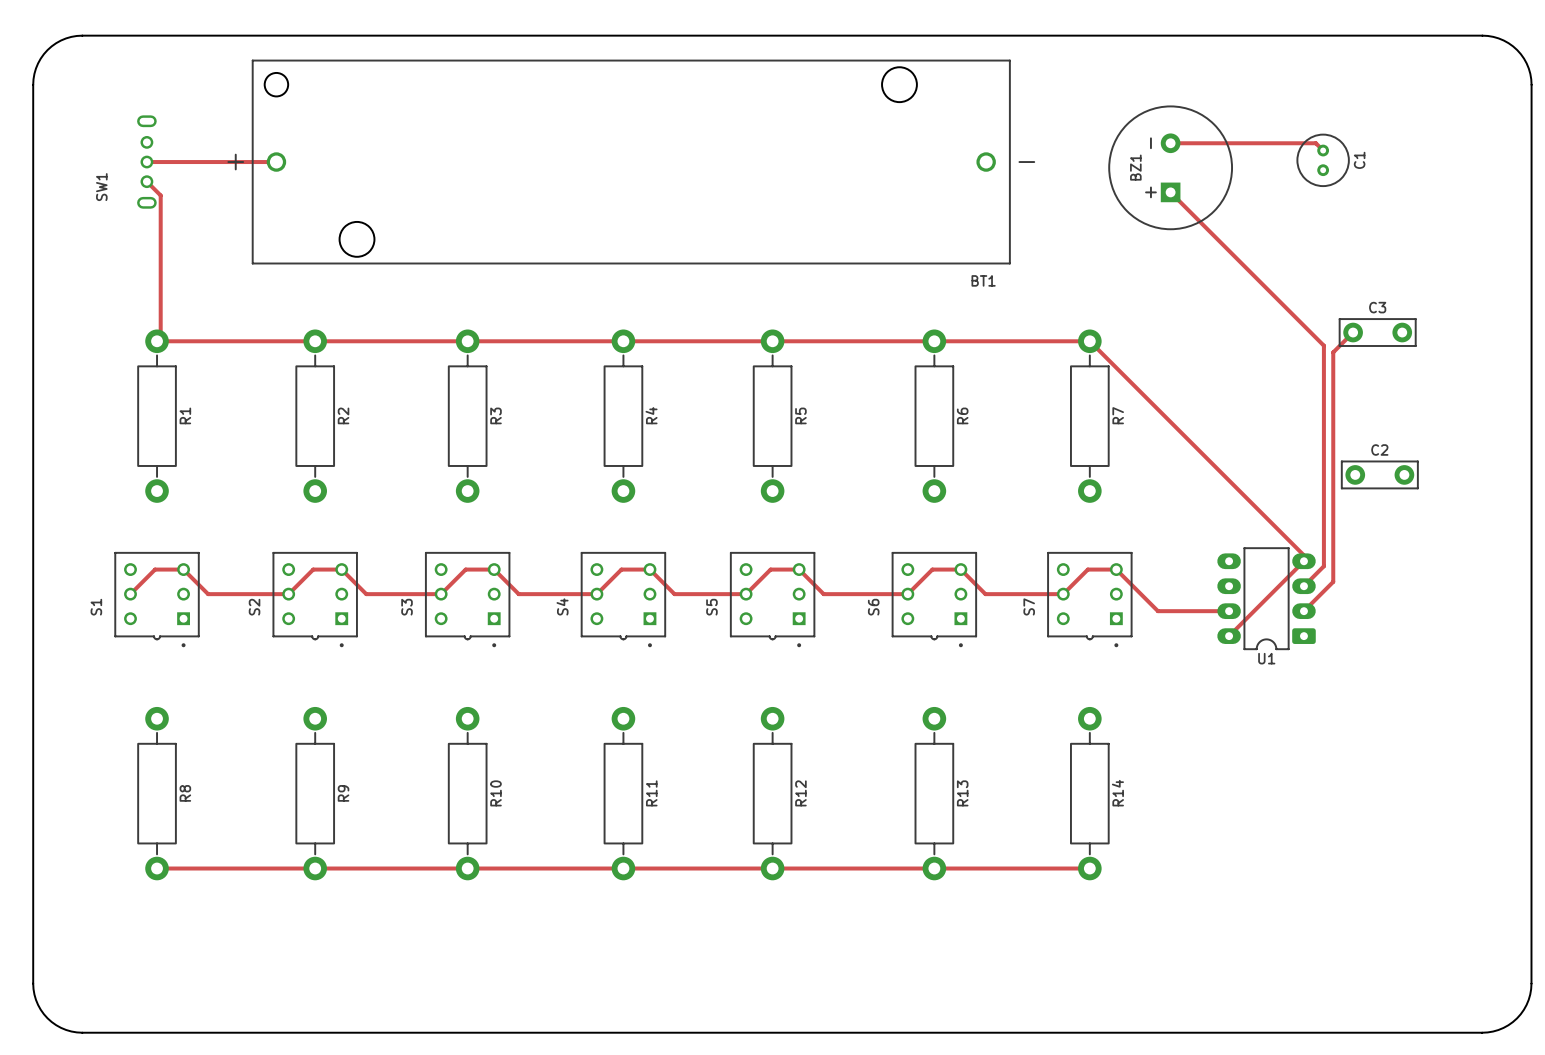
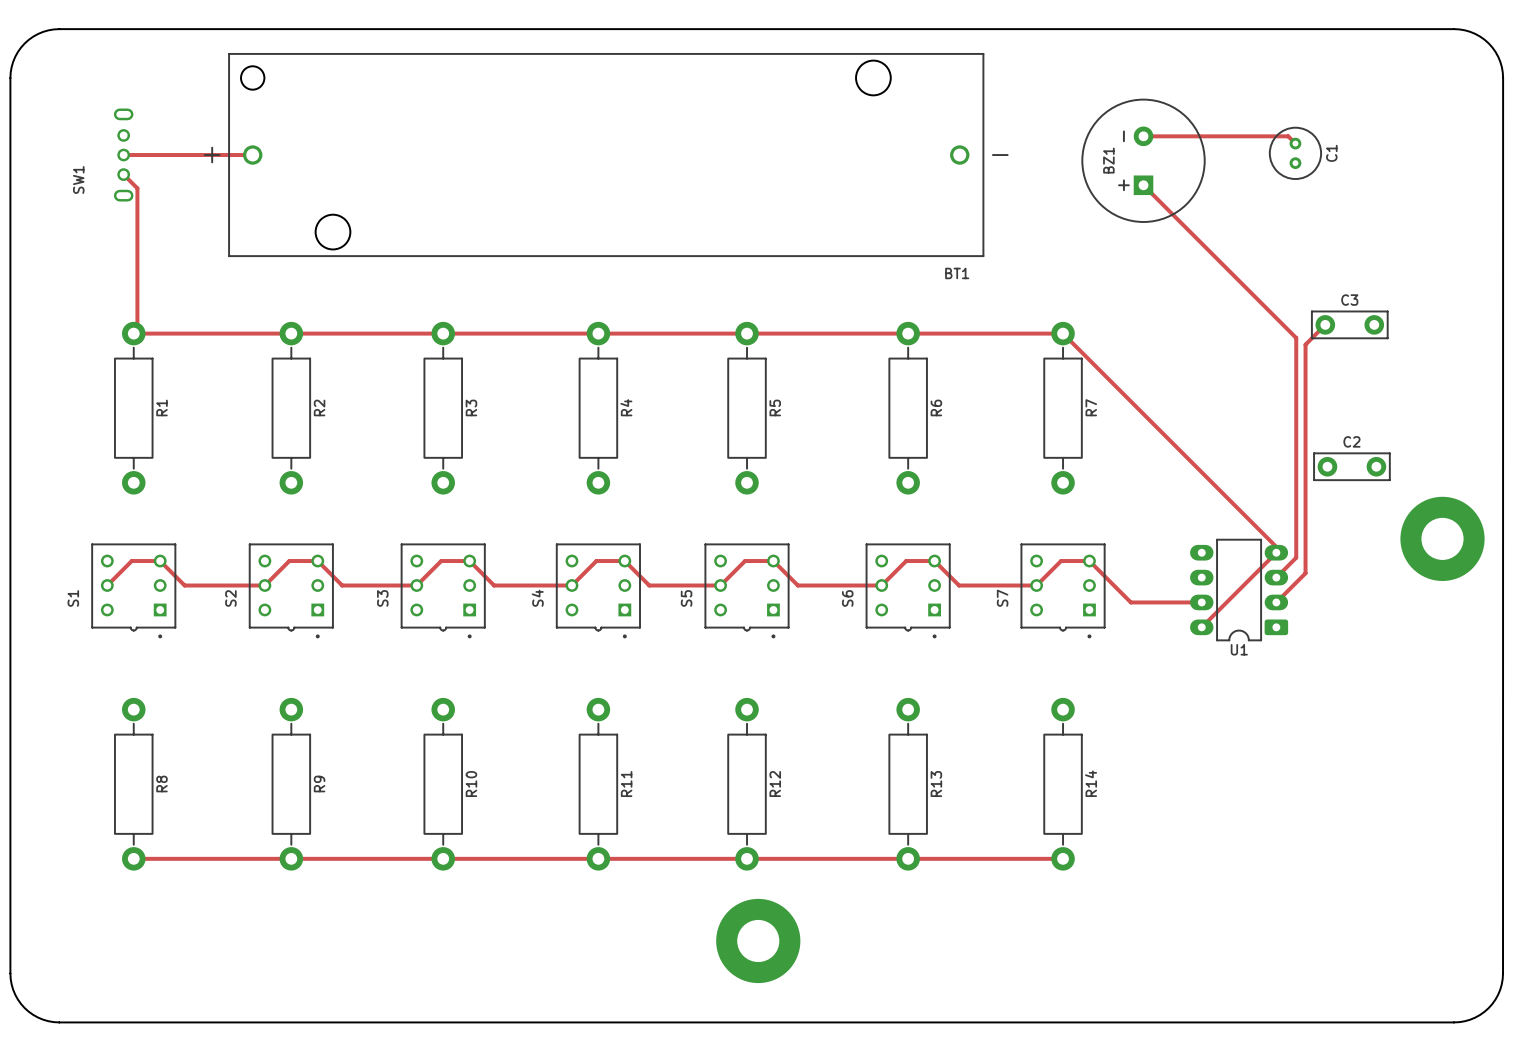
part: none -> (1442, 538)
part: none -> (758, 940)

